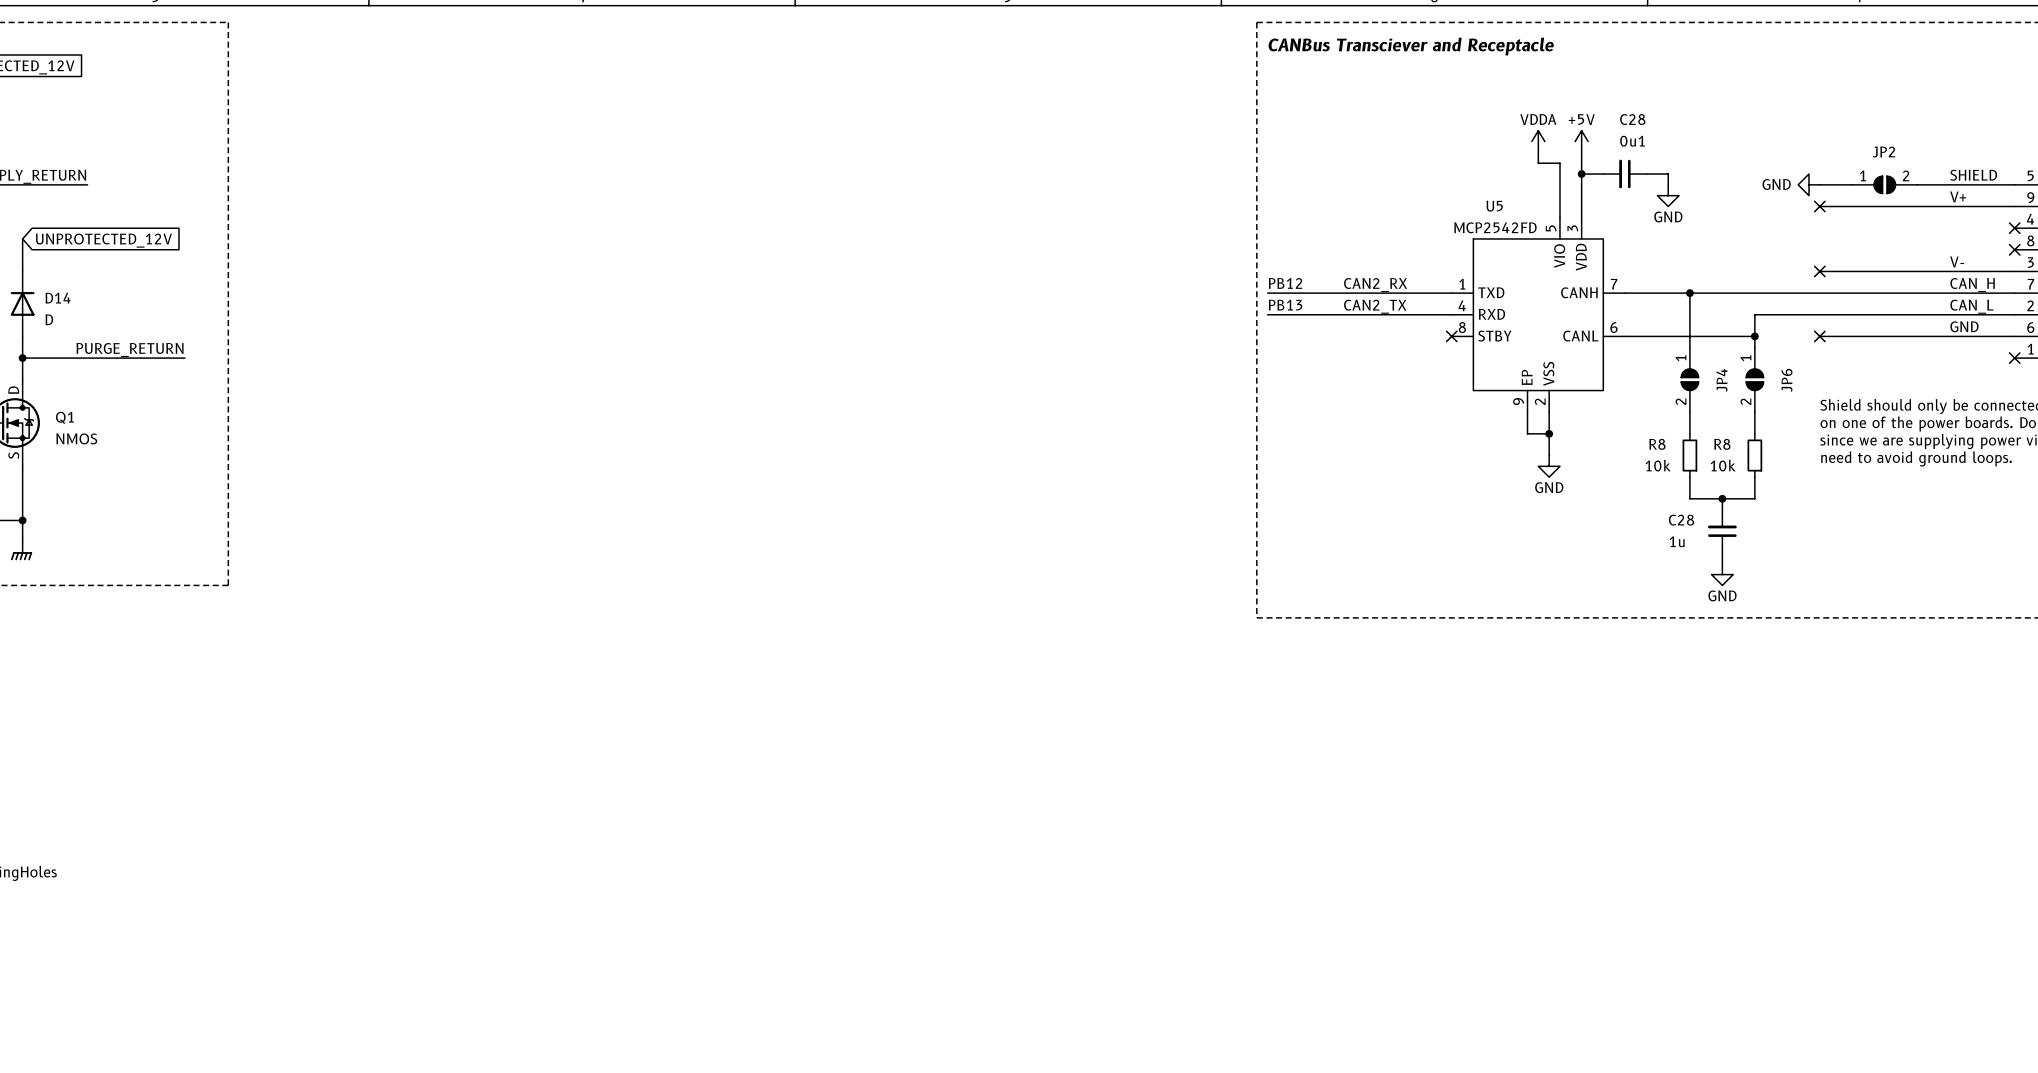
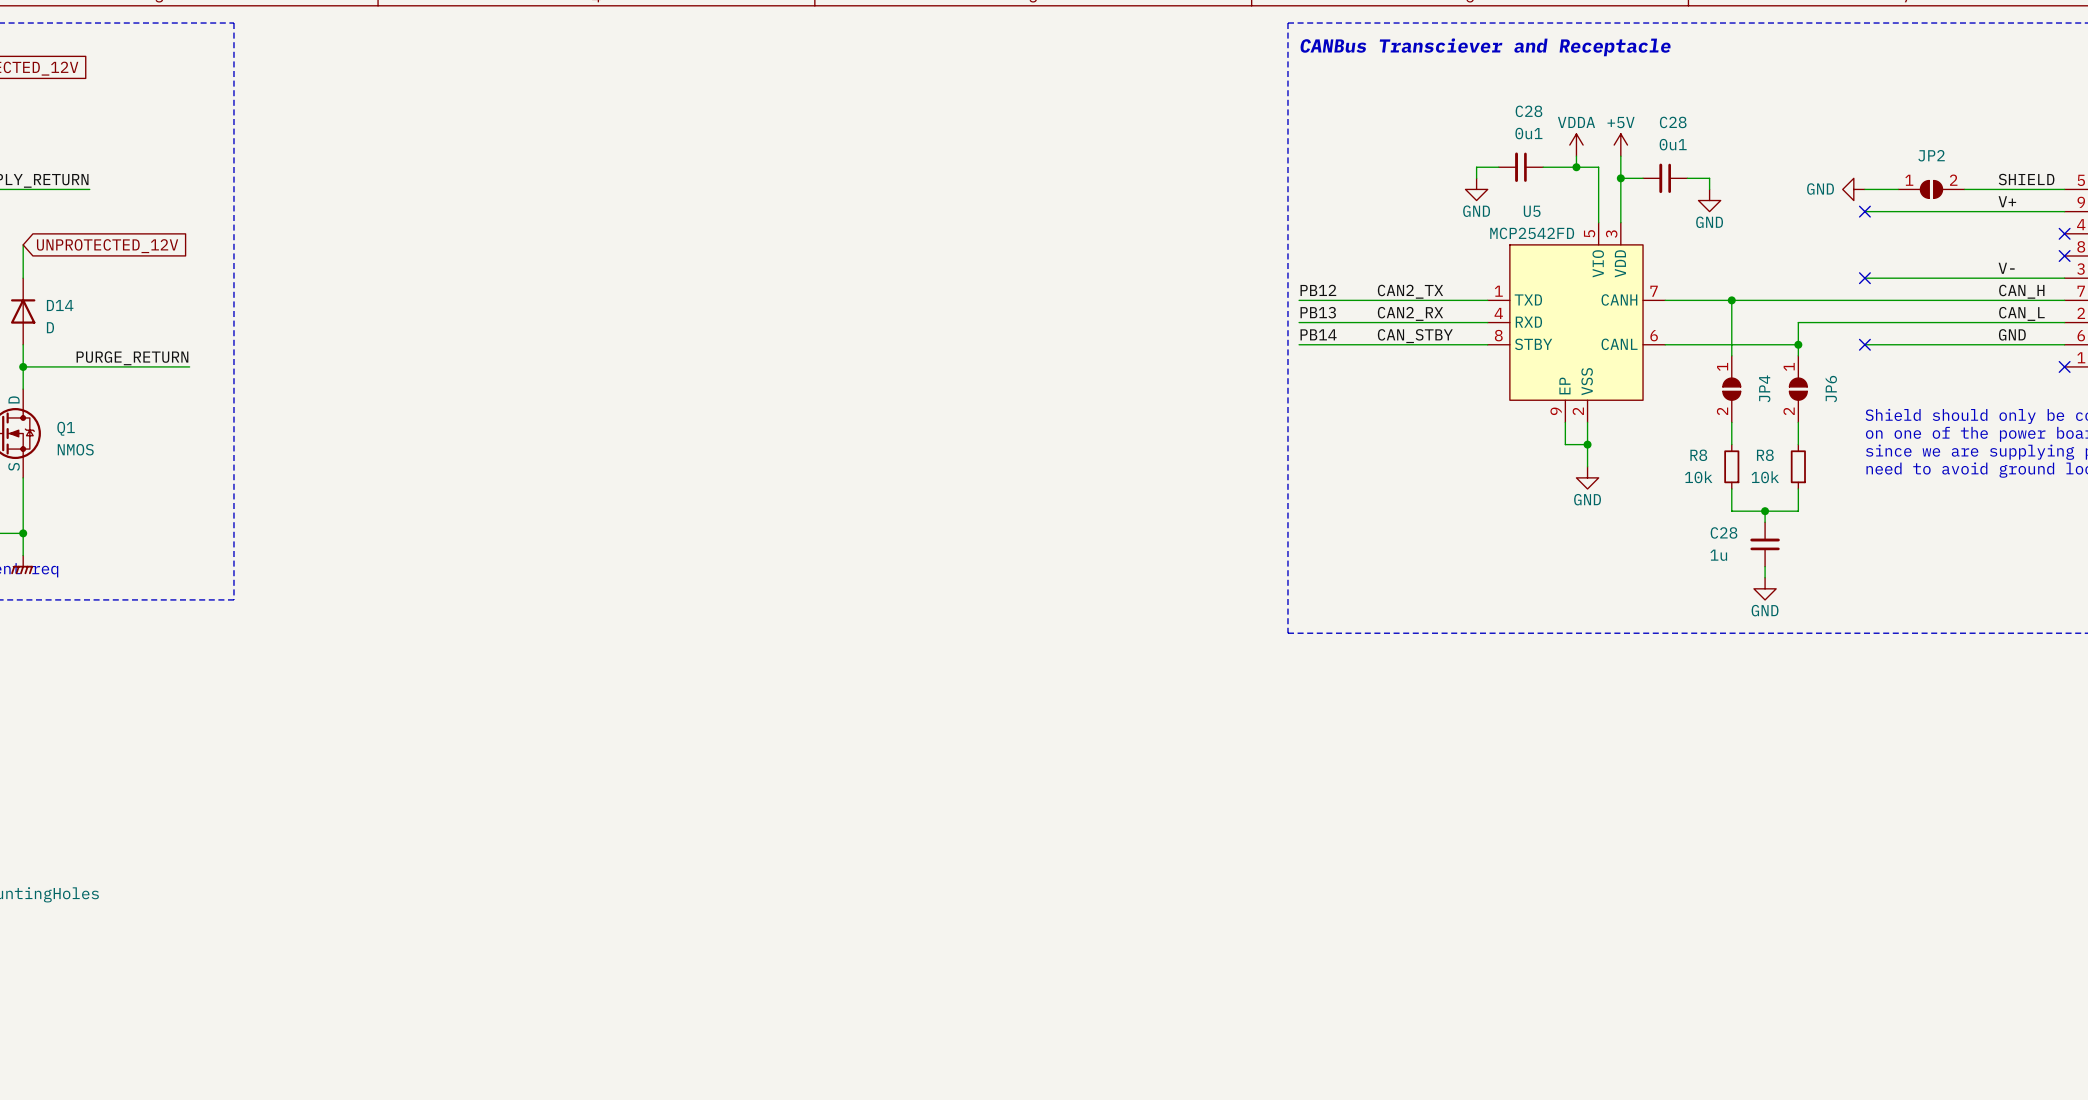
wire: none -> (1498, 167) (1476, 167) (1476, 178)
C28: none -> 0u1 (1520, 167)
wire: none -> (1543, 167) (1576, 167)
junction: none -> (1576, 167)
power symbol: none -> GND (1476, 189)
label: CAN2_RX (1375, 285) -> CAN2_TX (1410, 291)
label: CAN2_TX (1375, 306) -> CAN2_RX (1410, 313)
label: none -> PB14 (1318, 334)
label: none -> CAN_STBY (1415, 336)
wire: none -> (1299, 344) (1487, 344)
no-connect mark: (1451, 336) -> none

